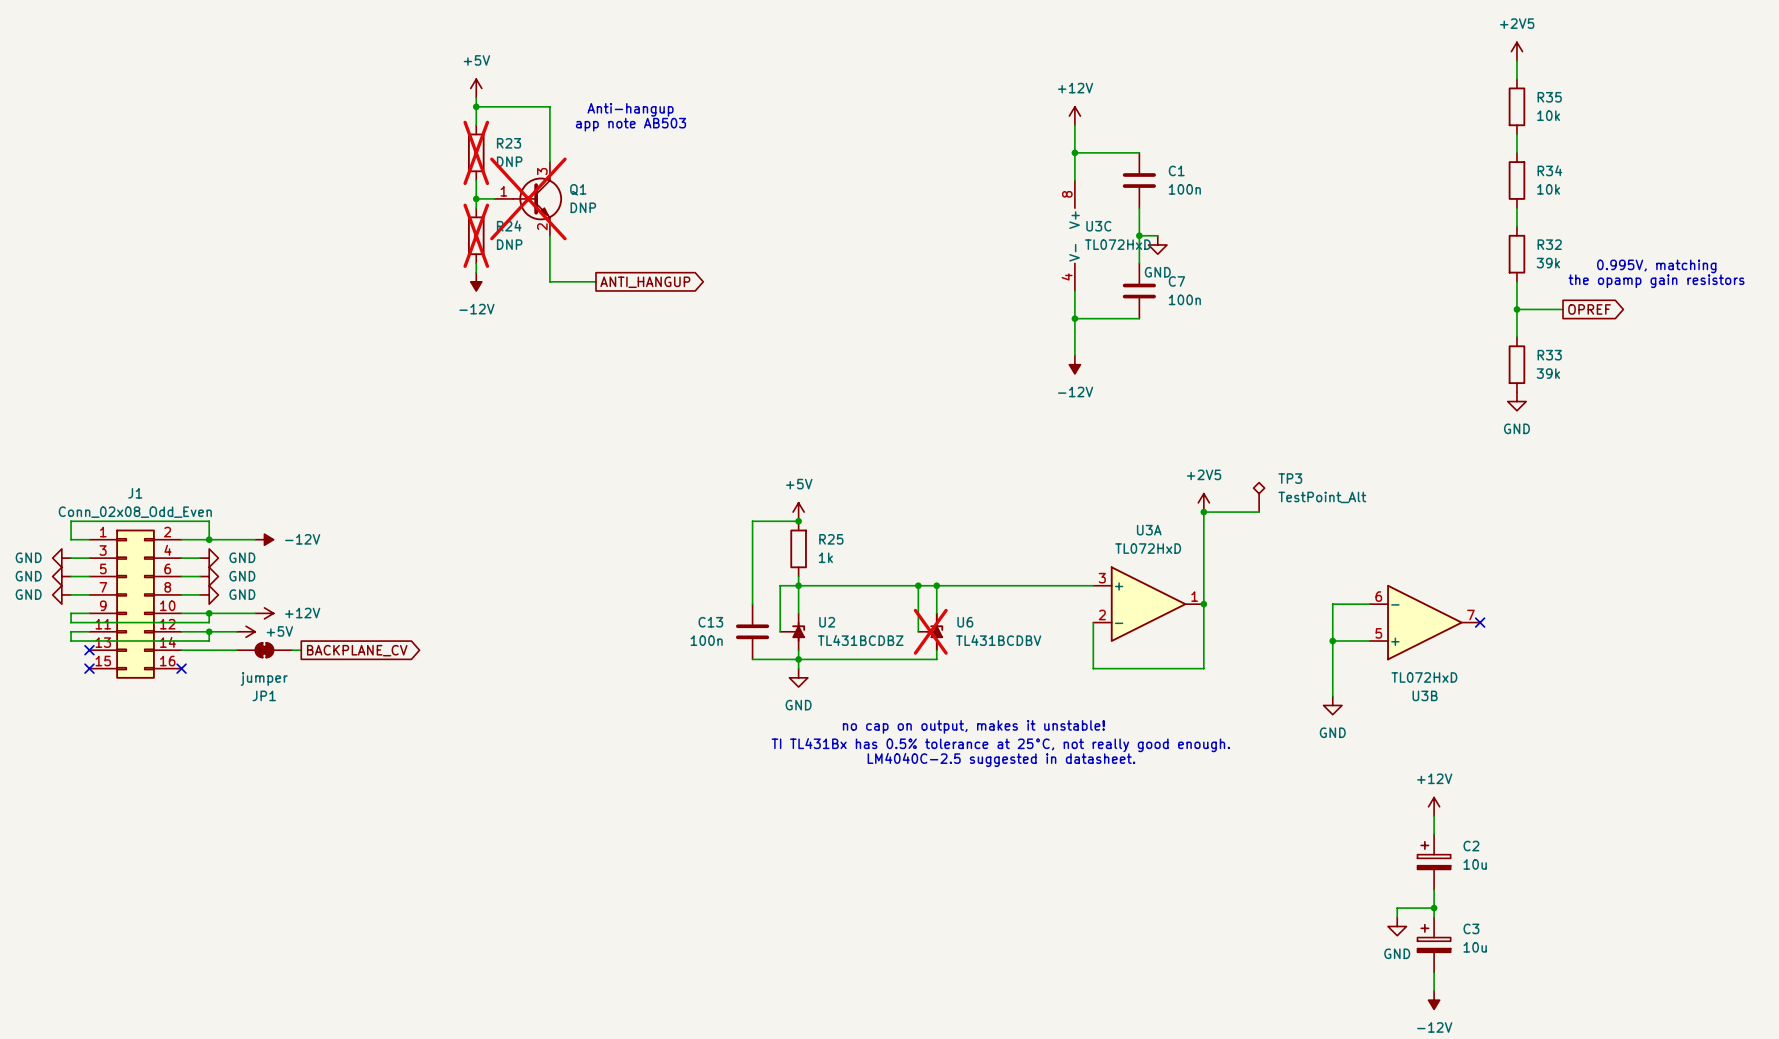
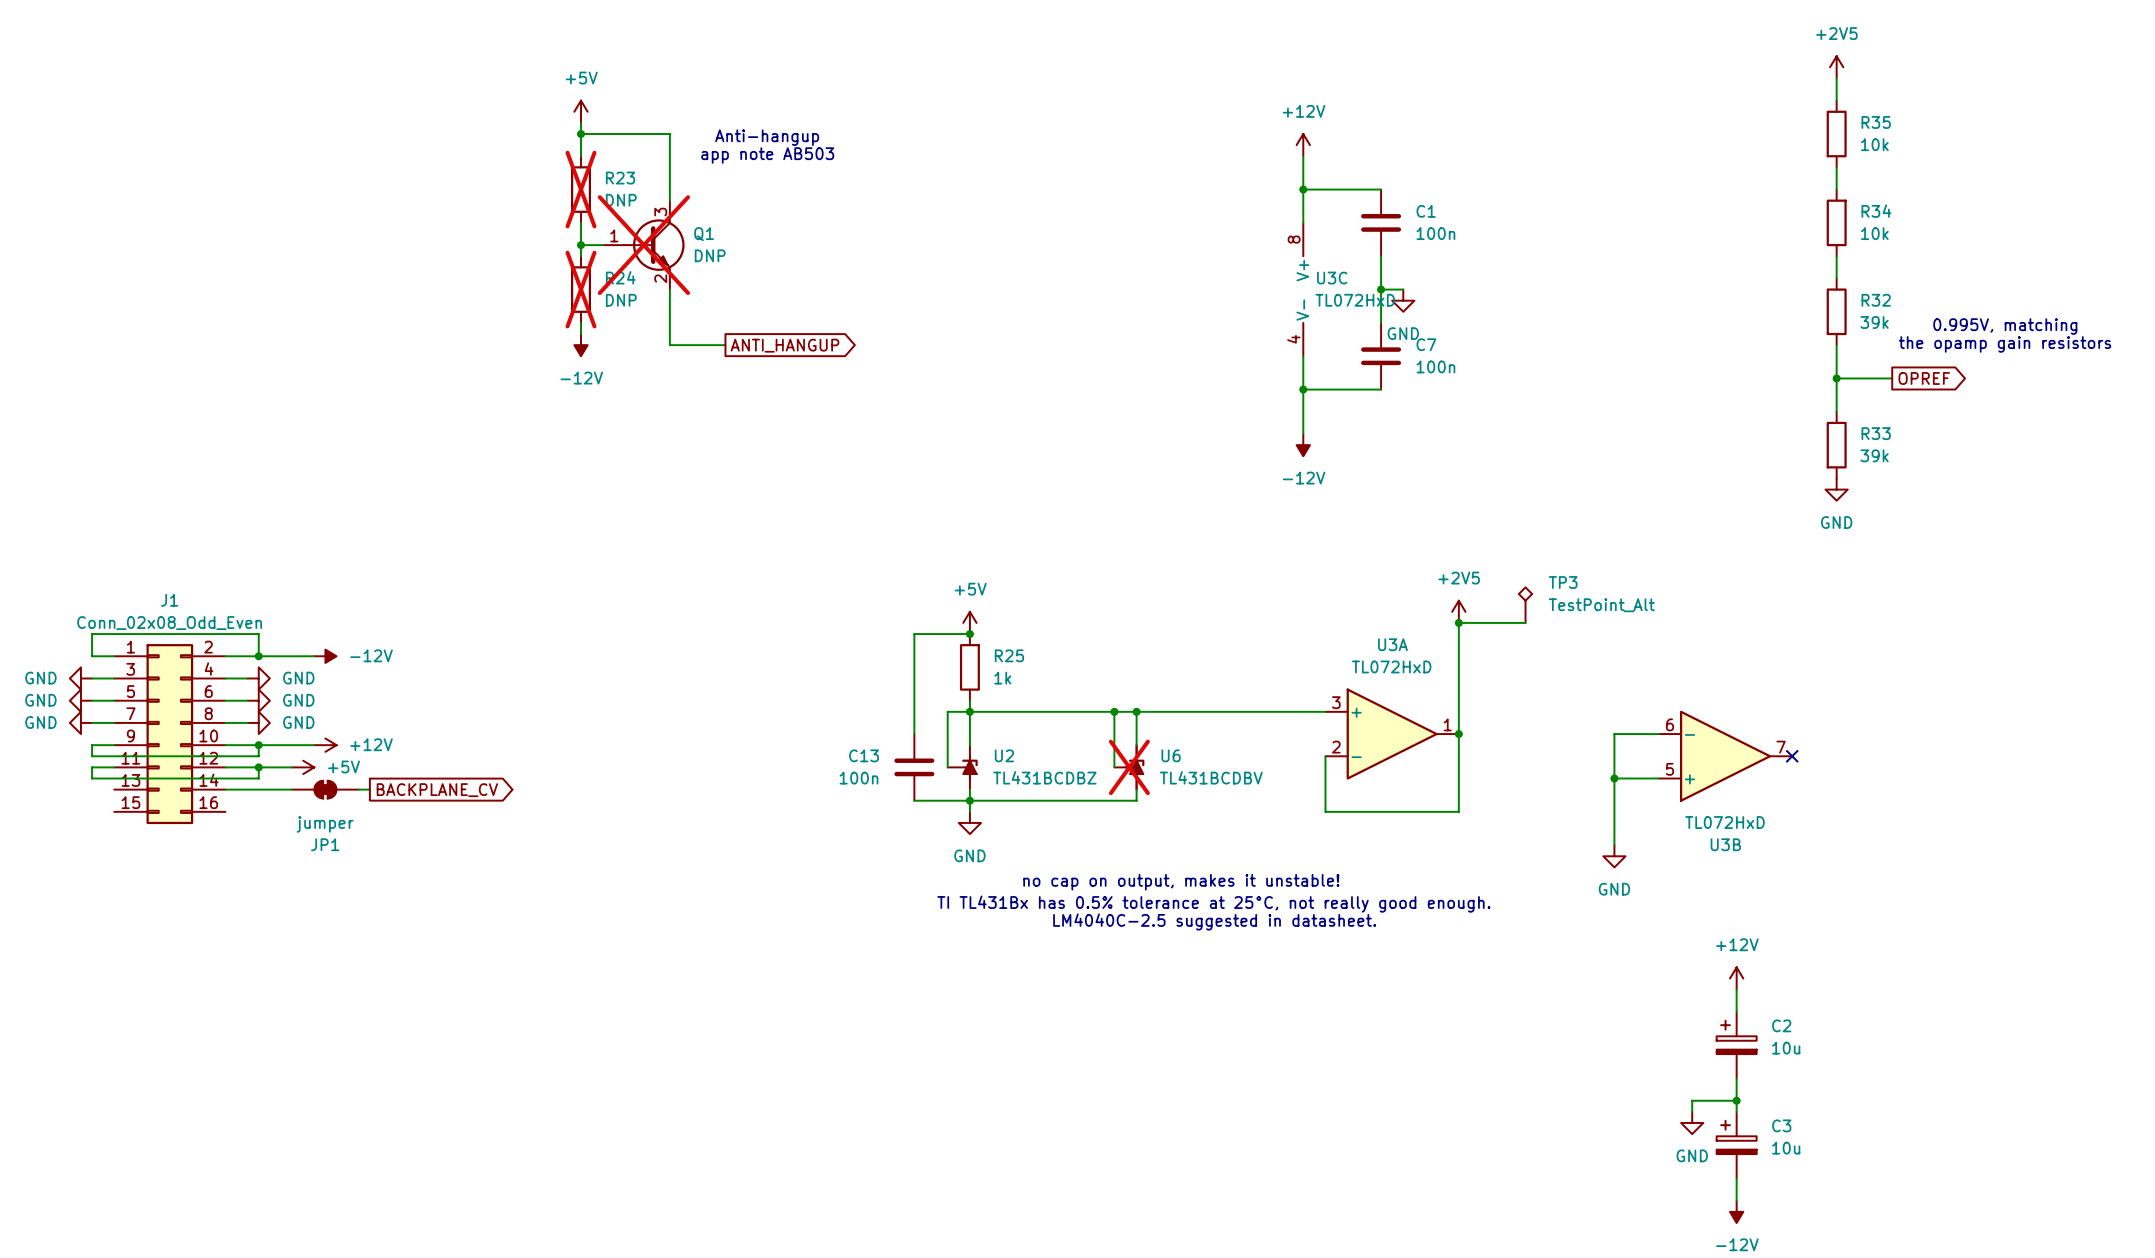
no-connect mark: (89, 650) -> none
no-connect mark: (89, 668) -> none
no-connect mark: (181, 668) -> none

